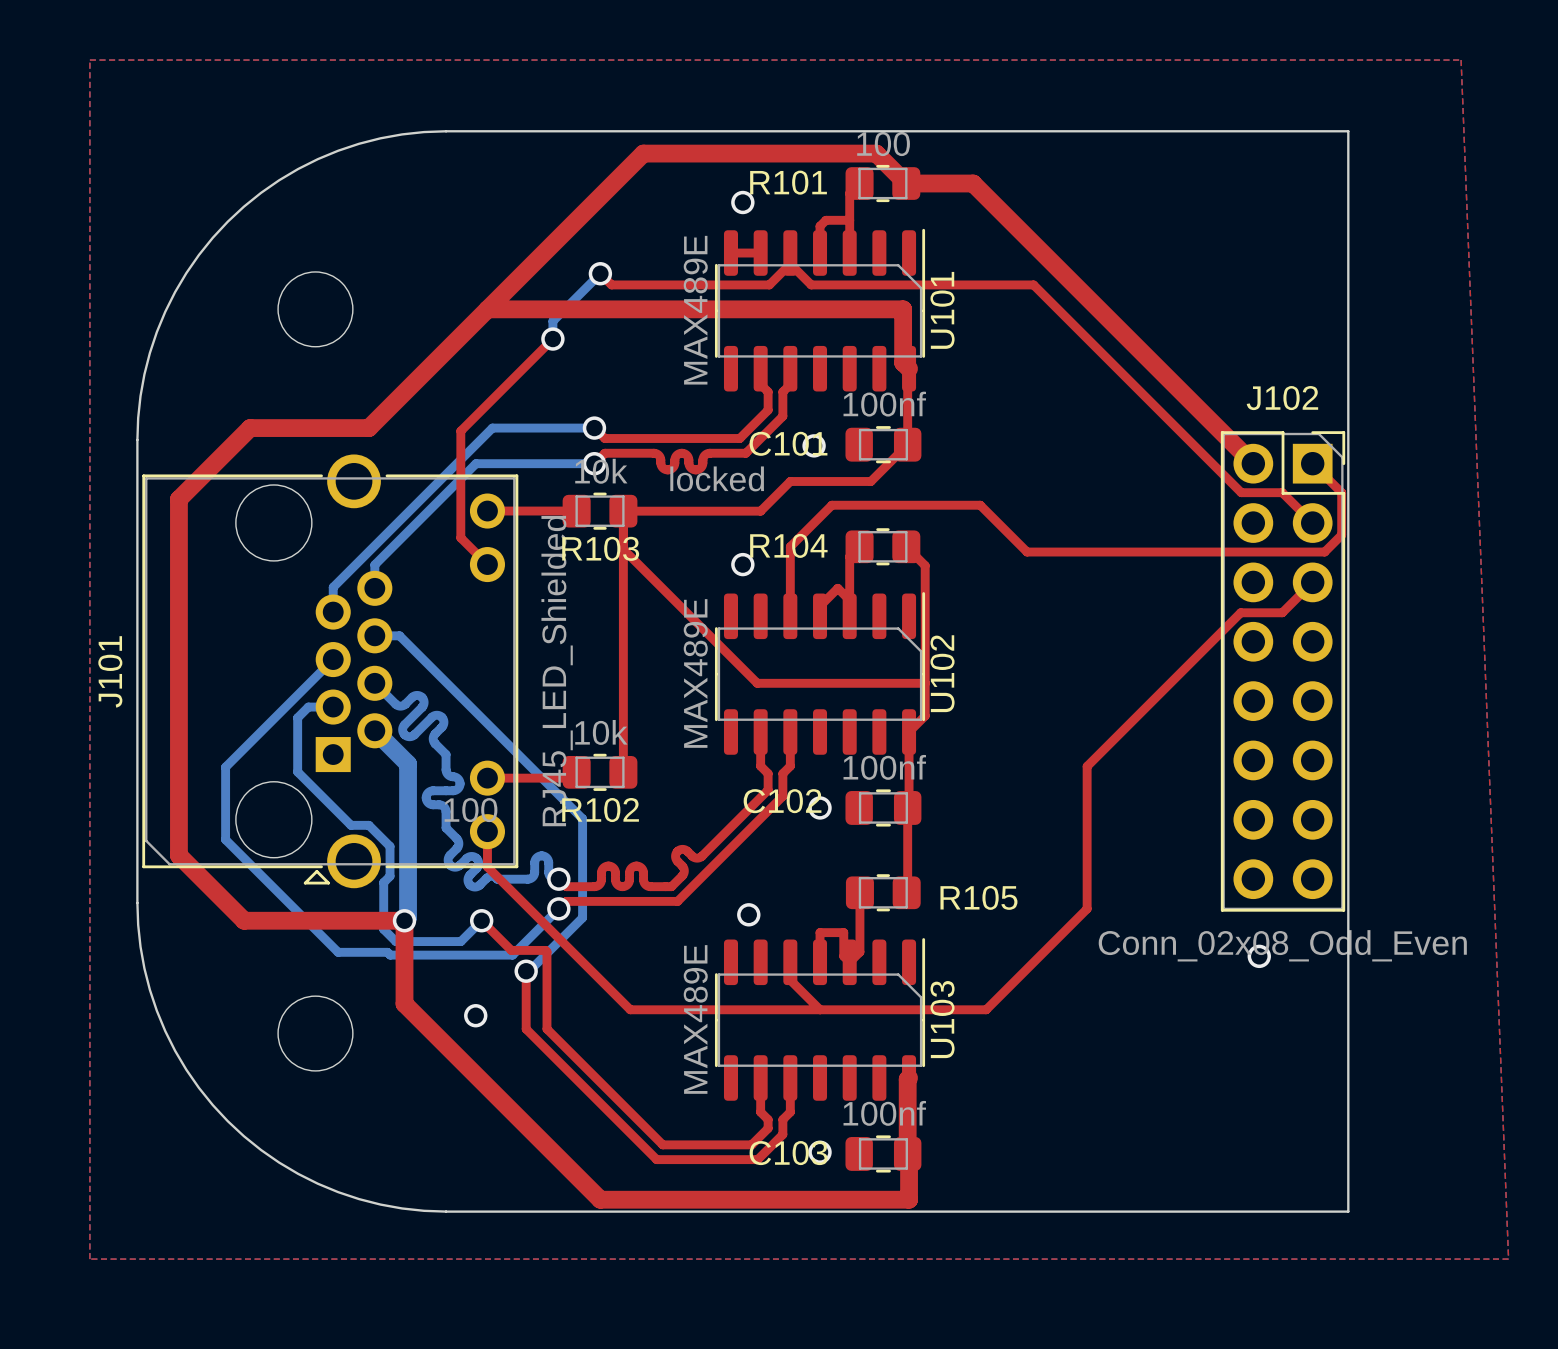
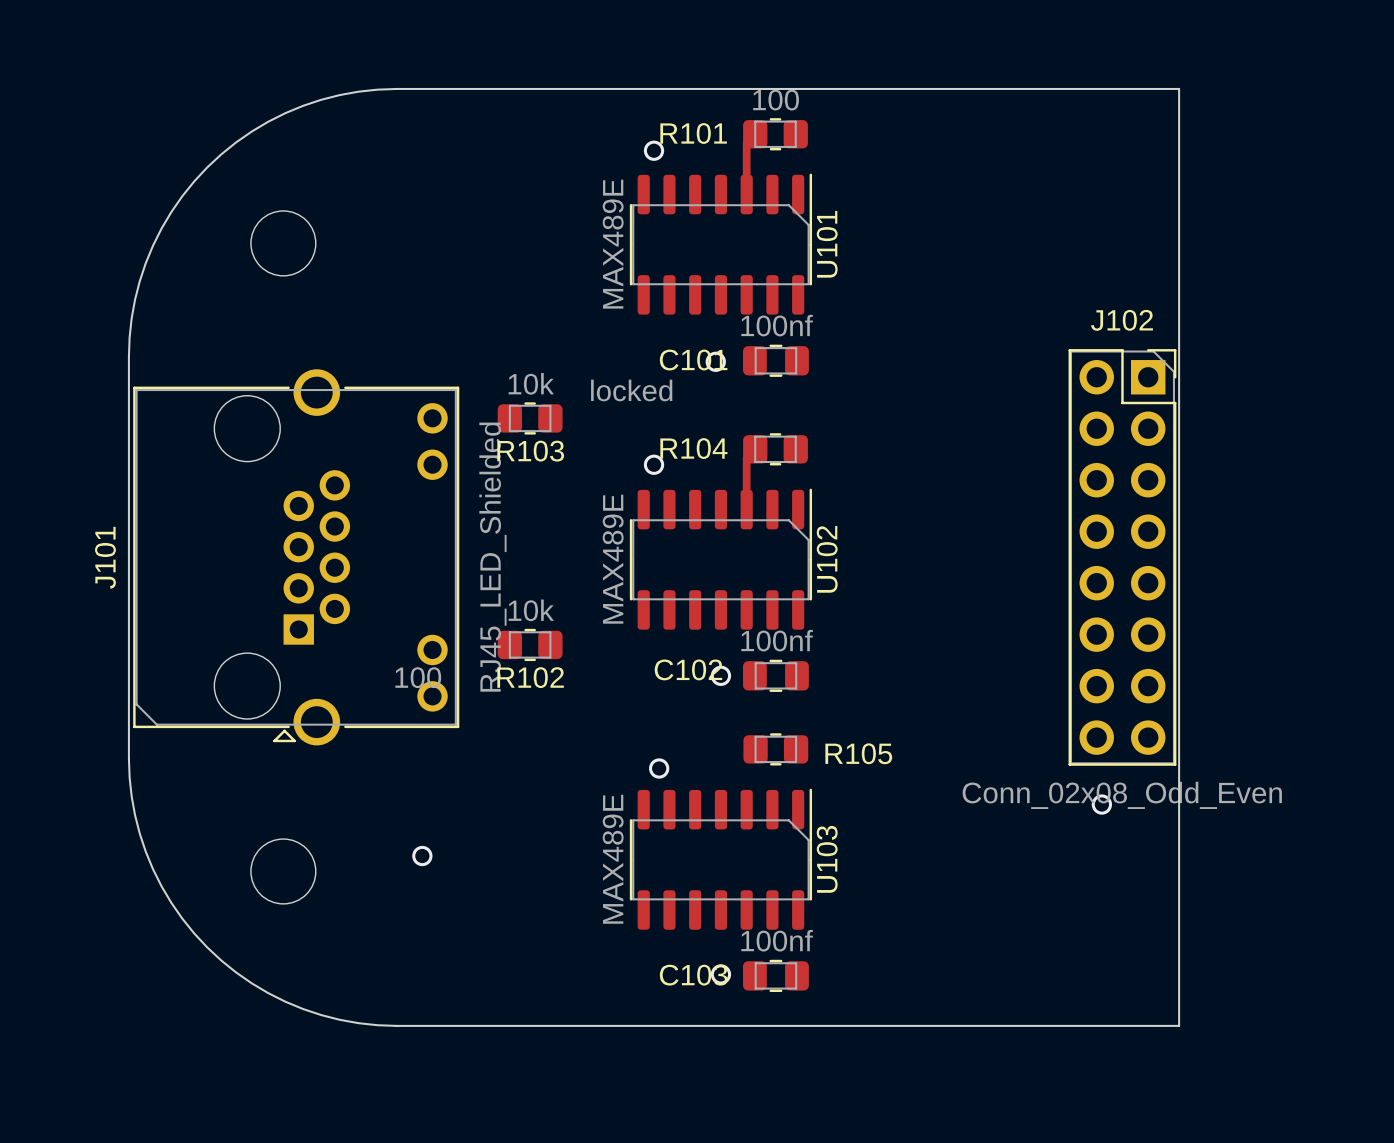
top zone outline: (89, 60) (89, 1259) (1508, 1259) (1461, 60) (89, 60) -> none
top track: (849, 220) (825, 220) (820, 226) (820, 253) -> none
top track: (730, 253) (760, 253) -> none
top track: (790, 264) (811, 284) (1033, 284) (1241, 492) (1282, 492) (1312, 523) -> none
top track: (790, 264) (769, 284) (611, 284) (600, 273) -> none
bottom track: (600, 273) (552, 321) (552, 339) -> none
via: (600, 273) -> none
top track: (487, 309) (903, 309) (903, 362) (909, 368) (907, 444) (870, 481) (790, 481) (760, 511) (623, 511) (623, 772) -> none
top track: (552, 339) (460, 431) (460, 537) (487, 564) -> none
via: (552, 339) -> none
top track: (760, 368) (760, 384) (768, 391) (768, 410) (739, 438) (604, 438) (594, 428) -> none
top track: (790, 368) (790, 384) (782, 391) (782, 416) (745, 453) (708, 453) (703, 457) (701, 467) (696, 469) (690, 467) (687, 456) (681, 453) (676, 455) (673, 466) (668, 469) (662, 467) (659, 456) (654, 453) (604, 453) (594, 463) -> none
bottom track: (594, 428) (492, 428) (333, 587) (333, 612) -> none
via: (594, 428) -> none
bottom track: (594, 463) (476, 463) (374, 564) (374, 588) -> none
via: (594, 463) -> none
top track: (1253, 463) (973, 183) (906, 183) (876, 153) (643, 153) (368, 428) (250, 428) (178, 499) (178, 855) (244, 920) (404, 920) (404, 1003) (600, 1199) (909, 1199) (909, 1077) -> none
top track: (1312, 463) (1341, 492) (1341, 535) (1324, 552) (1027, 552) (980, 505) (831, 505) (790, 546) (790, 616) -> none
top track: (487, 511) (576, 511) -> none
top track: (906, 546) (925, 565) (925, 715) (909, 731) (906, 892) -> none
top track: (623, 549) (757, 683) (925, 683) -> none
top track: (1312, 582) (1282, 612) (1240, 612) (1087, 766) (1087, 908) (986, 1009) (630, 1009) (487, 866) (487, 831) -> none
top track: (849, 600) (837, 588) (820, 606) (820, 616) -> none
bottom track: (374, 635) (399, 635) (582, 818) (582, 917) (529, 971) (526, 971) -> none
bottom track: (333, 659) (225, 767) (225, 839) (338, 952) (387, 952) (390, 955) (512, 955) (558, 908) -> none
bottom track: (374, 683) (398, 705) (404, 705) (415, 695) (423, 698) (422, 706) (403, 726) (403, 732) (406, 736) (414, 735) (434, 715) (439, 715) (443, 719) (443, 724) (434, 735) (433, 740) (446, 754) (447, 773) (458, 778) (459, 785) (453, 790) (430, 791) (426, 797) (429, 803) (440, 805) (444, 807) (446, 827) (458, 841) (457, 847) (448, 857) (450, 865) (456, 867) (468, 857) (476, 857) (478, 865) (467, 880) (470, 885) (475, 886) (490, 876) (497, 879) (530, 878) (534, 874) (535, 859) (542, 855) (548, 860) (550, 876) (558, 879) -> none
bottom track: (333, 707) (308, 707) (297, 717) (297, 771) (351, 825) (368, 825) (390, 846) (390, 876) (383, 882) (383, 929) (395, 941) (460, 941) (481, 920) -> none
bottom track: (374, 730) (408, 764) (408, 917) (404, 920) -> none
top track: (760, 731) (760, 766) (768, 773) (768, 790) (700, 857) (694, 857) (684, 849) (677, 851) (675, 858) (683, 867) (684, 872) (671, 886) (647, 885) (643, 881) (643, 870) (637, 866) (630, 868) (628, 882) (623, 886) (616, 883) (614, 870) (609, 866) (602, 869) (600, 882) (596, 886) (566, 886) (558, 879) -> none
top track: (790, 731) (790, 766) (782, 773) (782, 796) (677, 901) (566, 901) (558, 908) -> none
top track: (576, 772) (570, 778) (487, 778) -> none
via: (558, 879) -> none
top track: (859, 892) (859, 952) (849, 962) (843, 956) (843, 932) (820, 932) (820, 962) -> none
via: (558, 908) -> none
via: (404, 920) -> none
top track: (481, 920) (511, 950) (546, 951) (546, 1029) (662, 1144) (751, 1144) (768, 1128) (768, 1119) (760, 1112) (760, 1077) -> none
via: (481, 920) -> none
top track: (790, 962) (790, 980) (820, 1009) -> none
top track: (526, 971) (526, 1029) (656, 1159) (757, 1159) (782, 1134) (782, 1119) (790, 1112) (790, 1077) -> none
via: (526, 971) -> none

